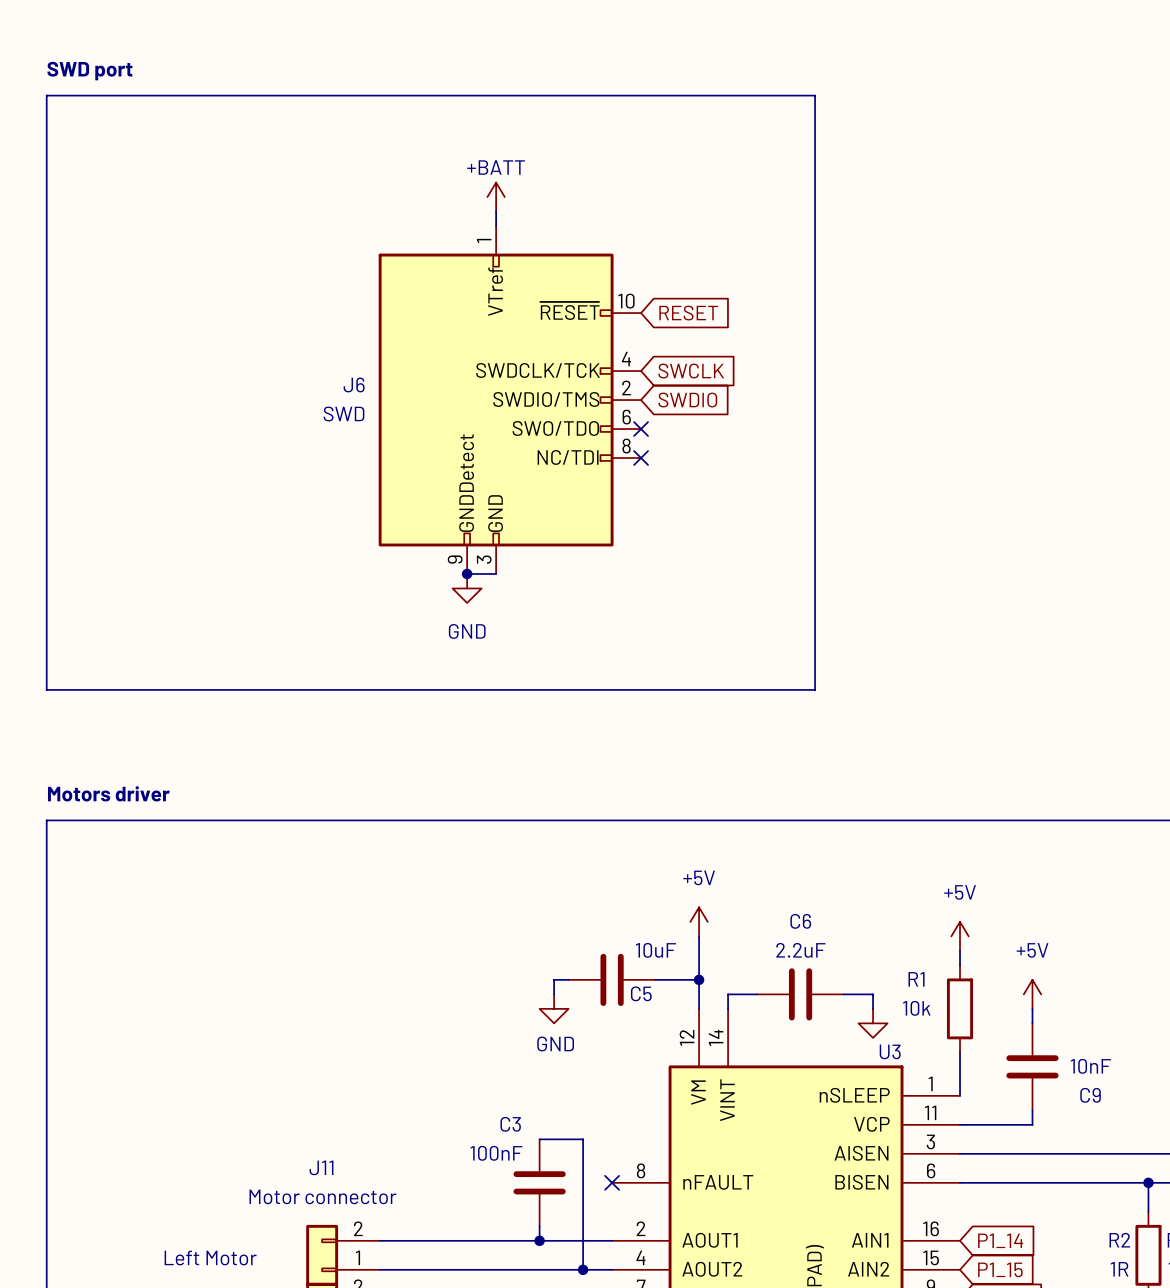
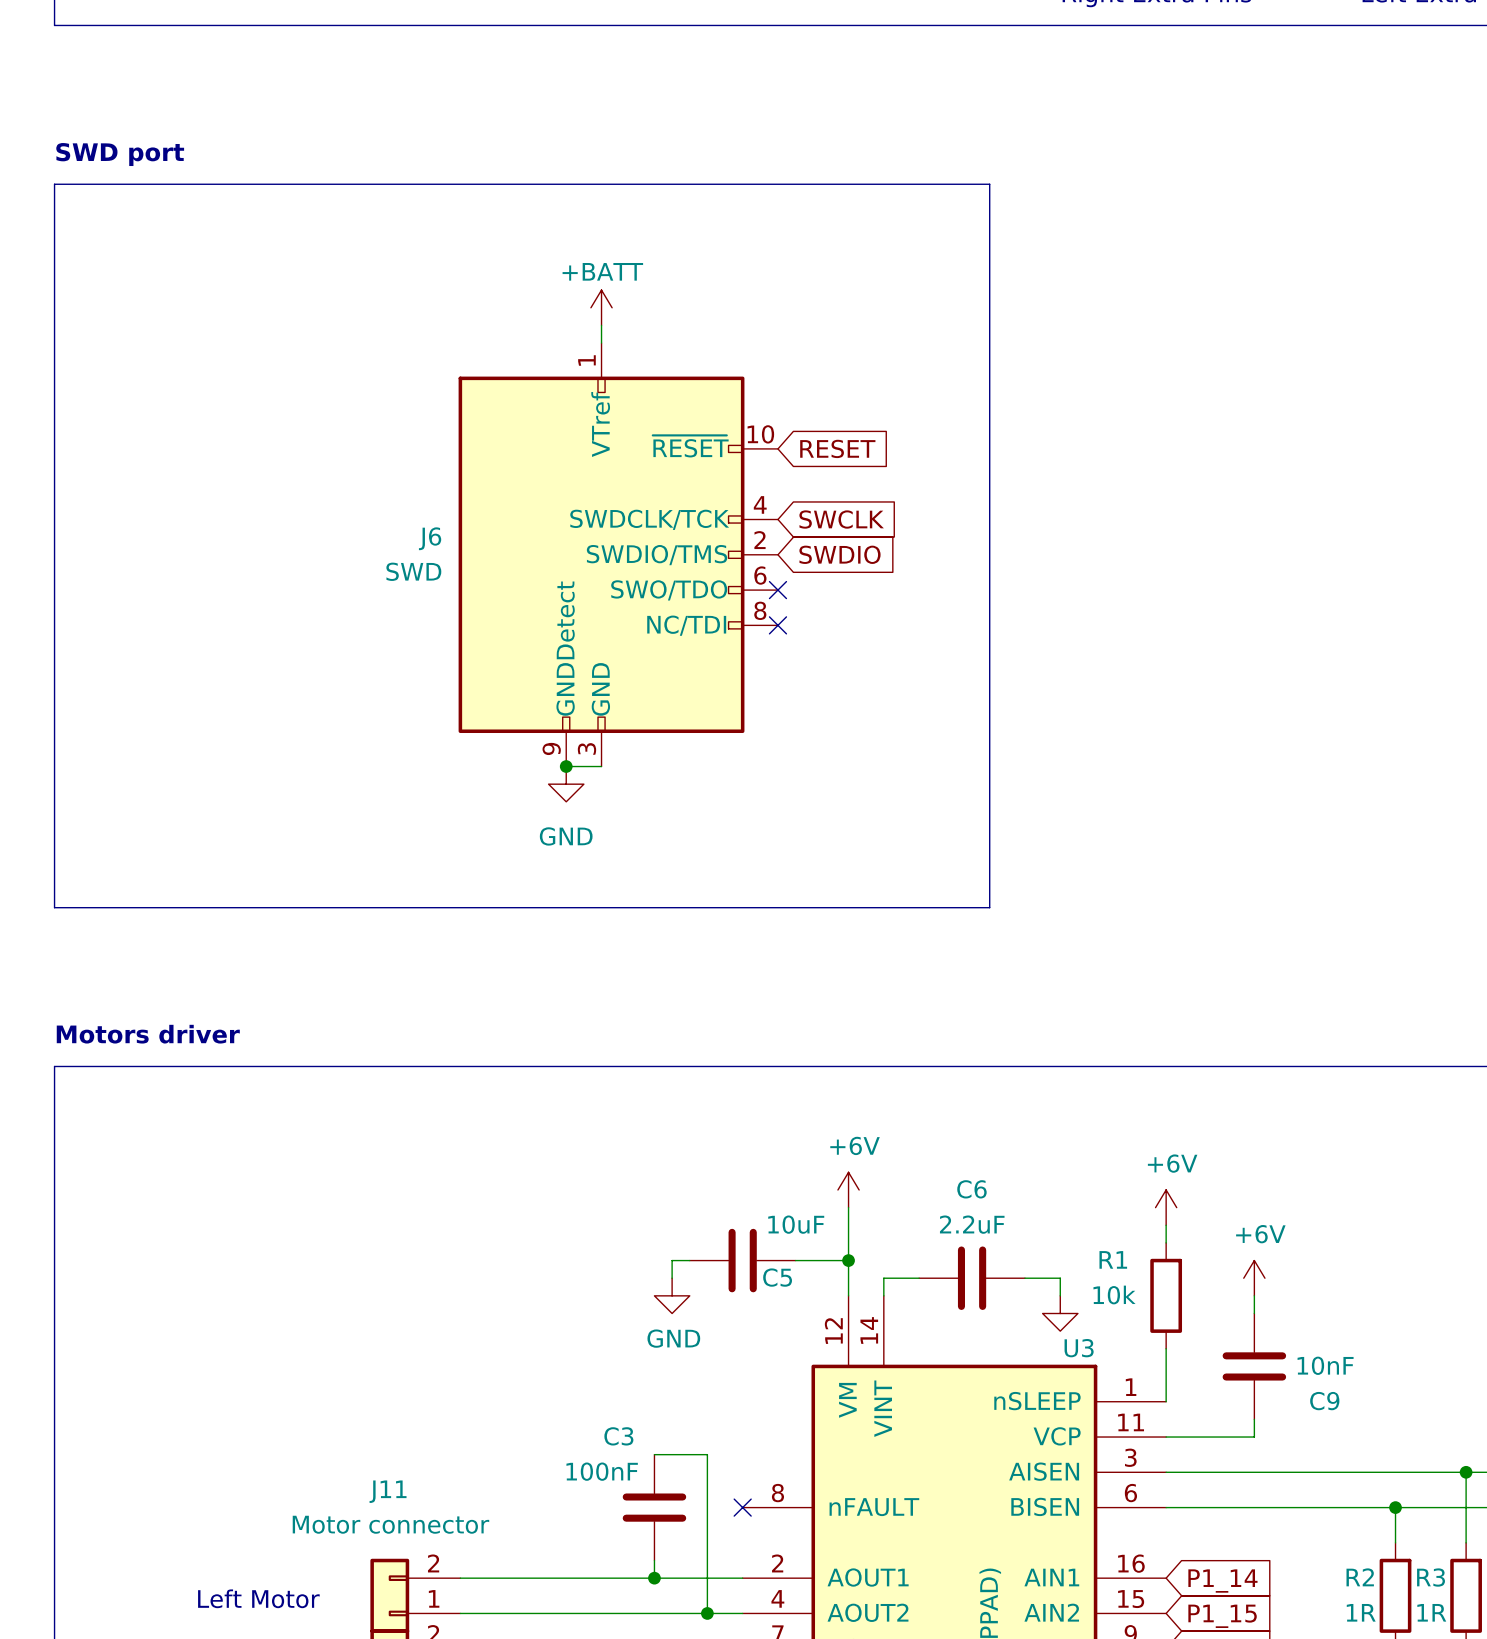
power symbol: +5V (699, 921) -> +6V (848, 1189)
power symbol: +5V (960, 936) -> +6V (1166, 1207)
power symbol: +5V (1032, 994) -> +6V (1254, 1278)

